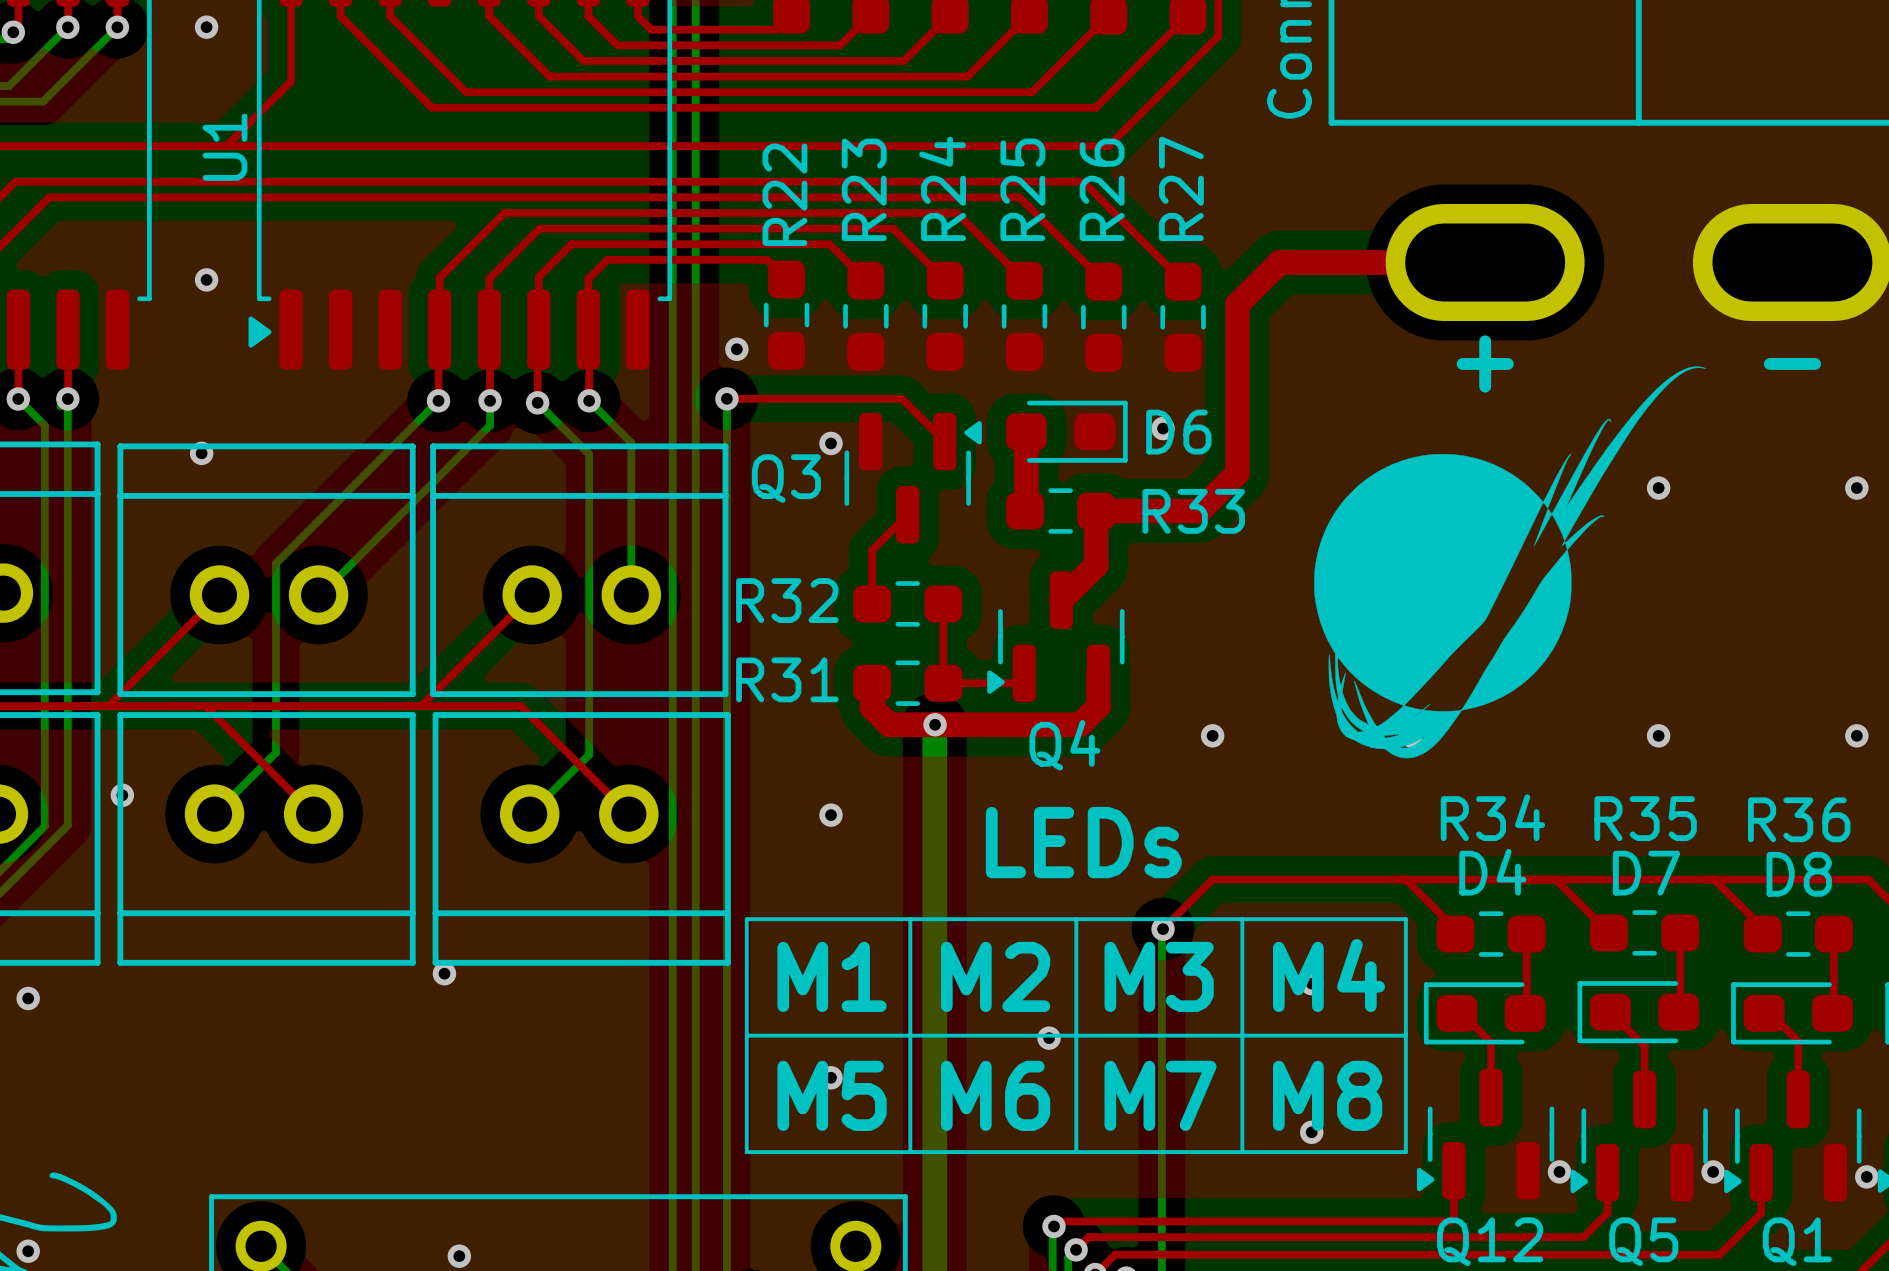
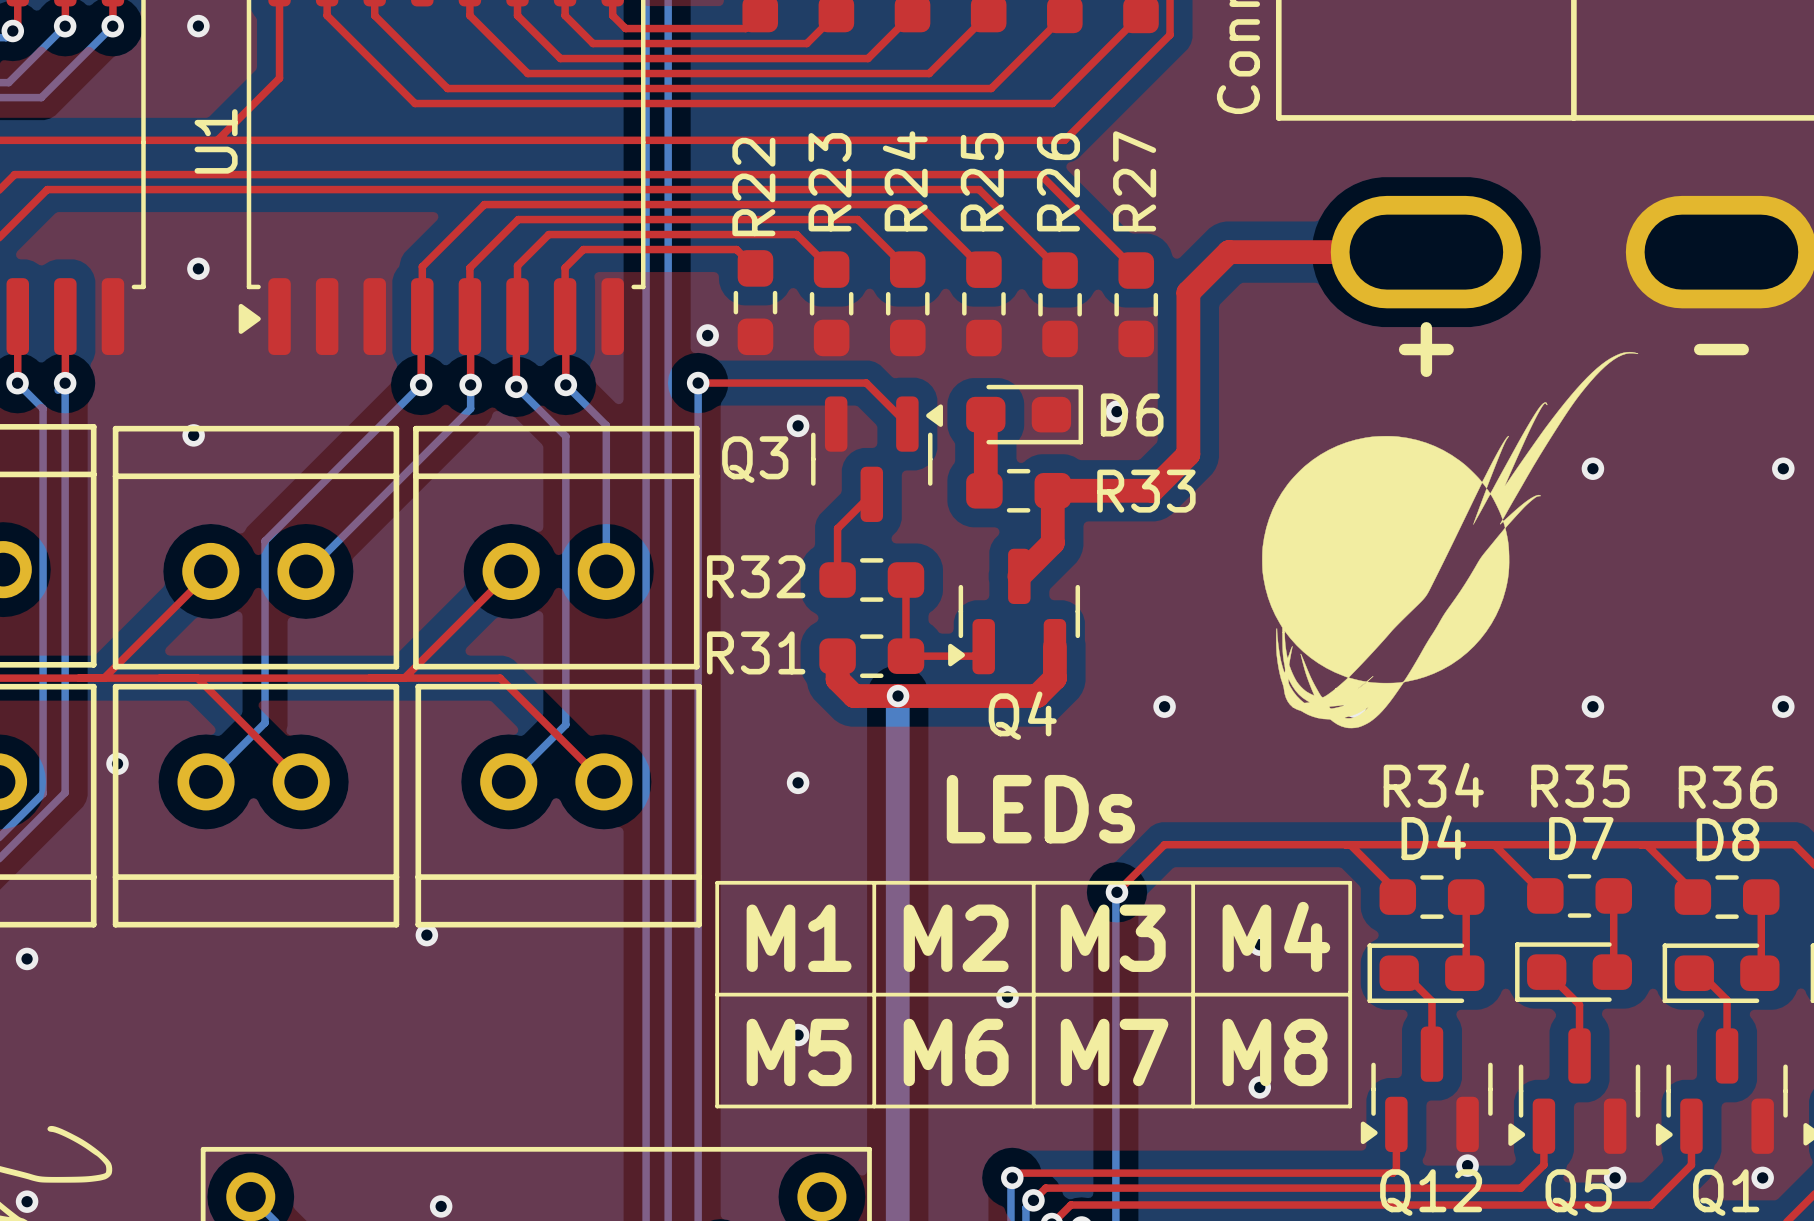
via position: (1559, 1171) -> (1467, 1165)
via position: (1713, 1171) -> (1615, 1177)
via position: (1866, 1176) -> (1762, 1177)

